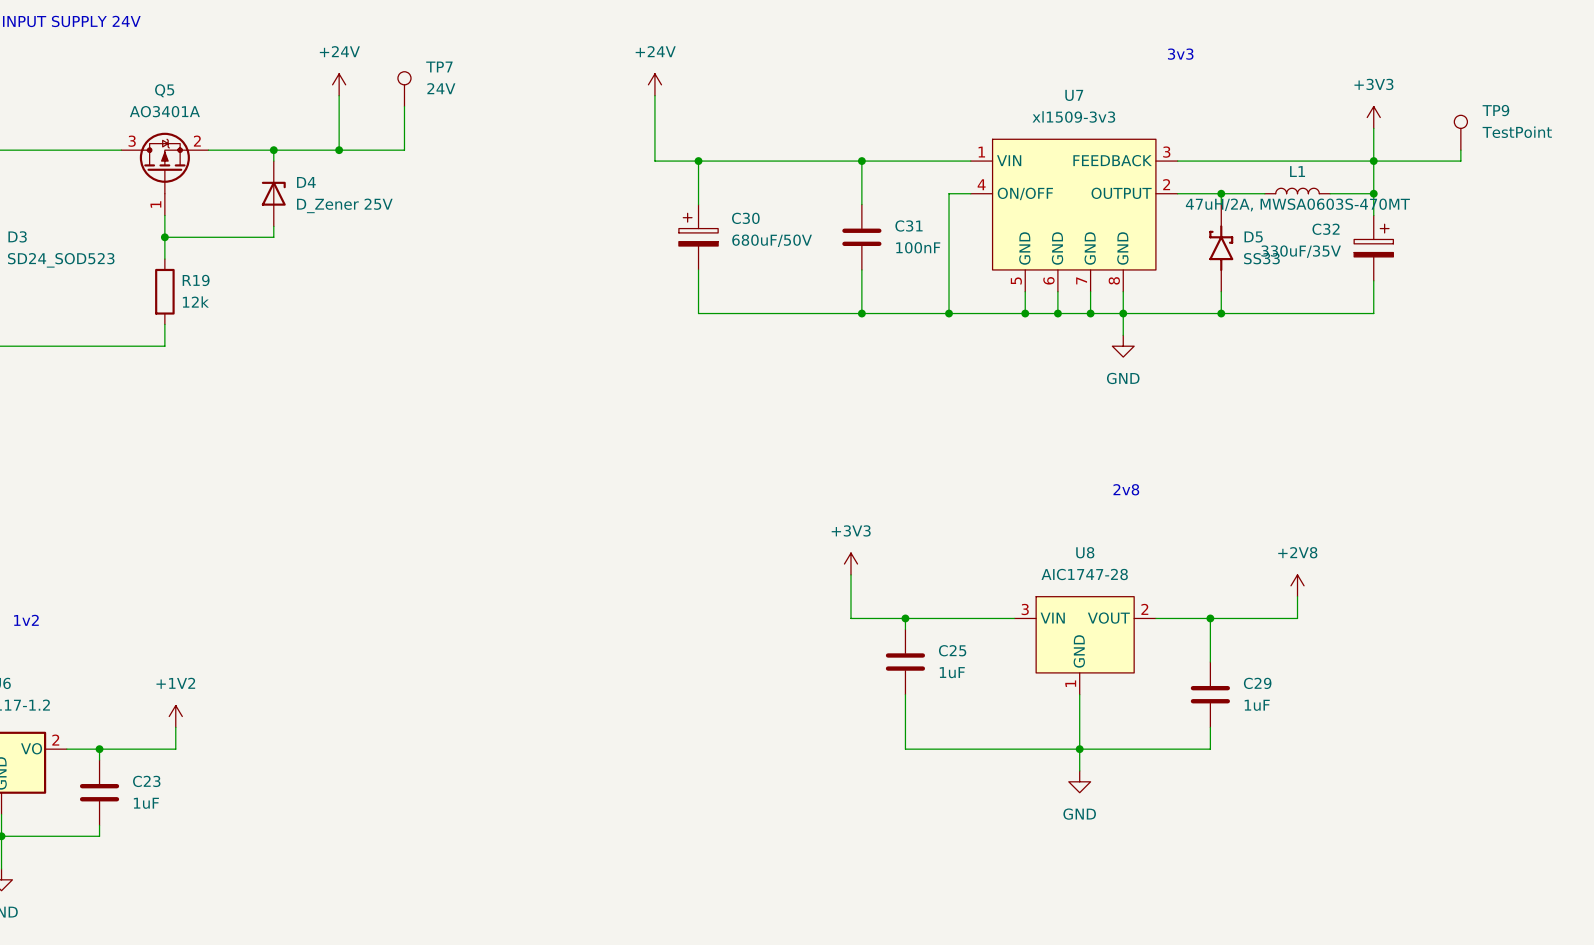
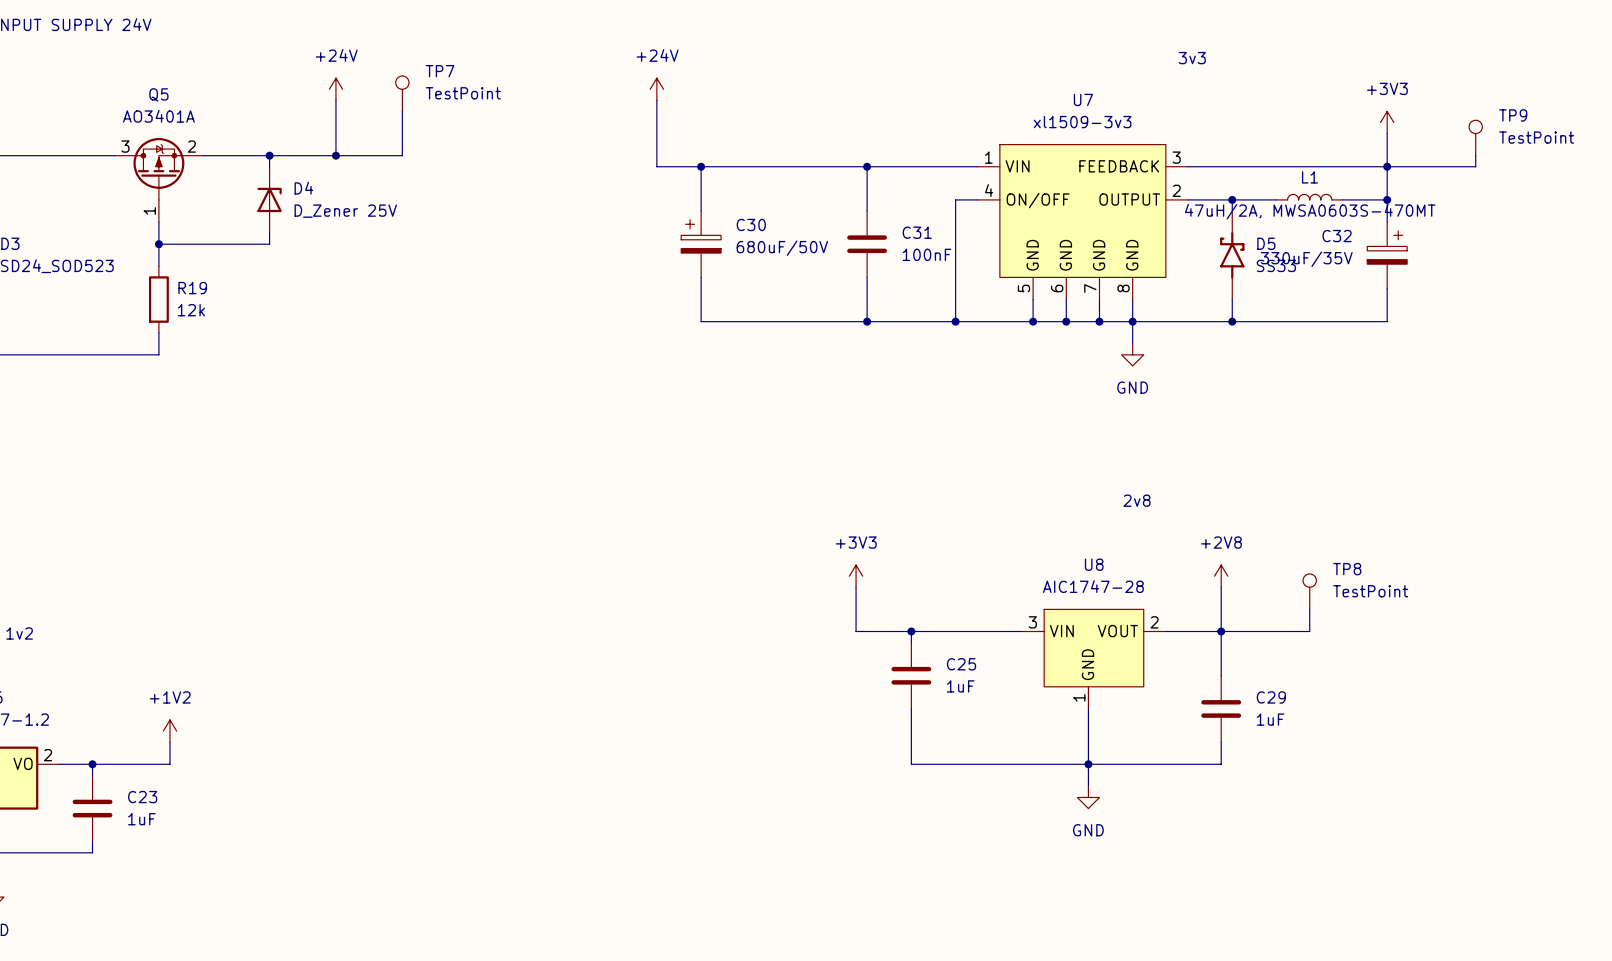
TP7 value: 24V (441, 88) -> TestPoint (463, 93)
wire: none -> (1221, 587) (1221, 631)
TP8: none -> TestPoint (1309, 591)
power symbol position: +2V8 (1297, 585) -> +2V8 (1221, 576)

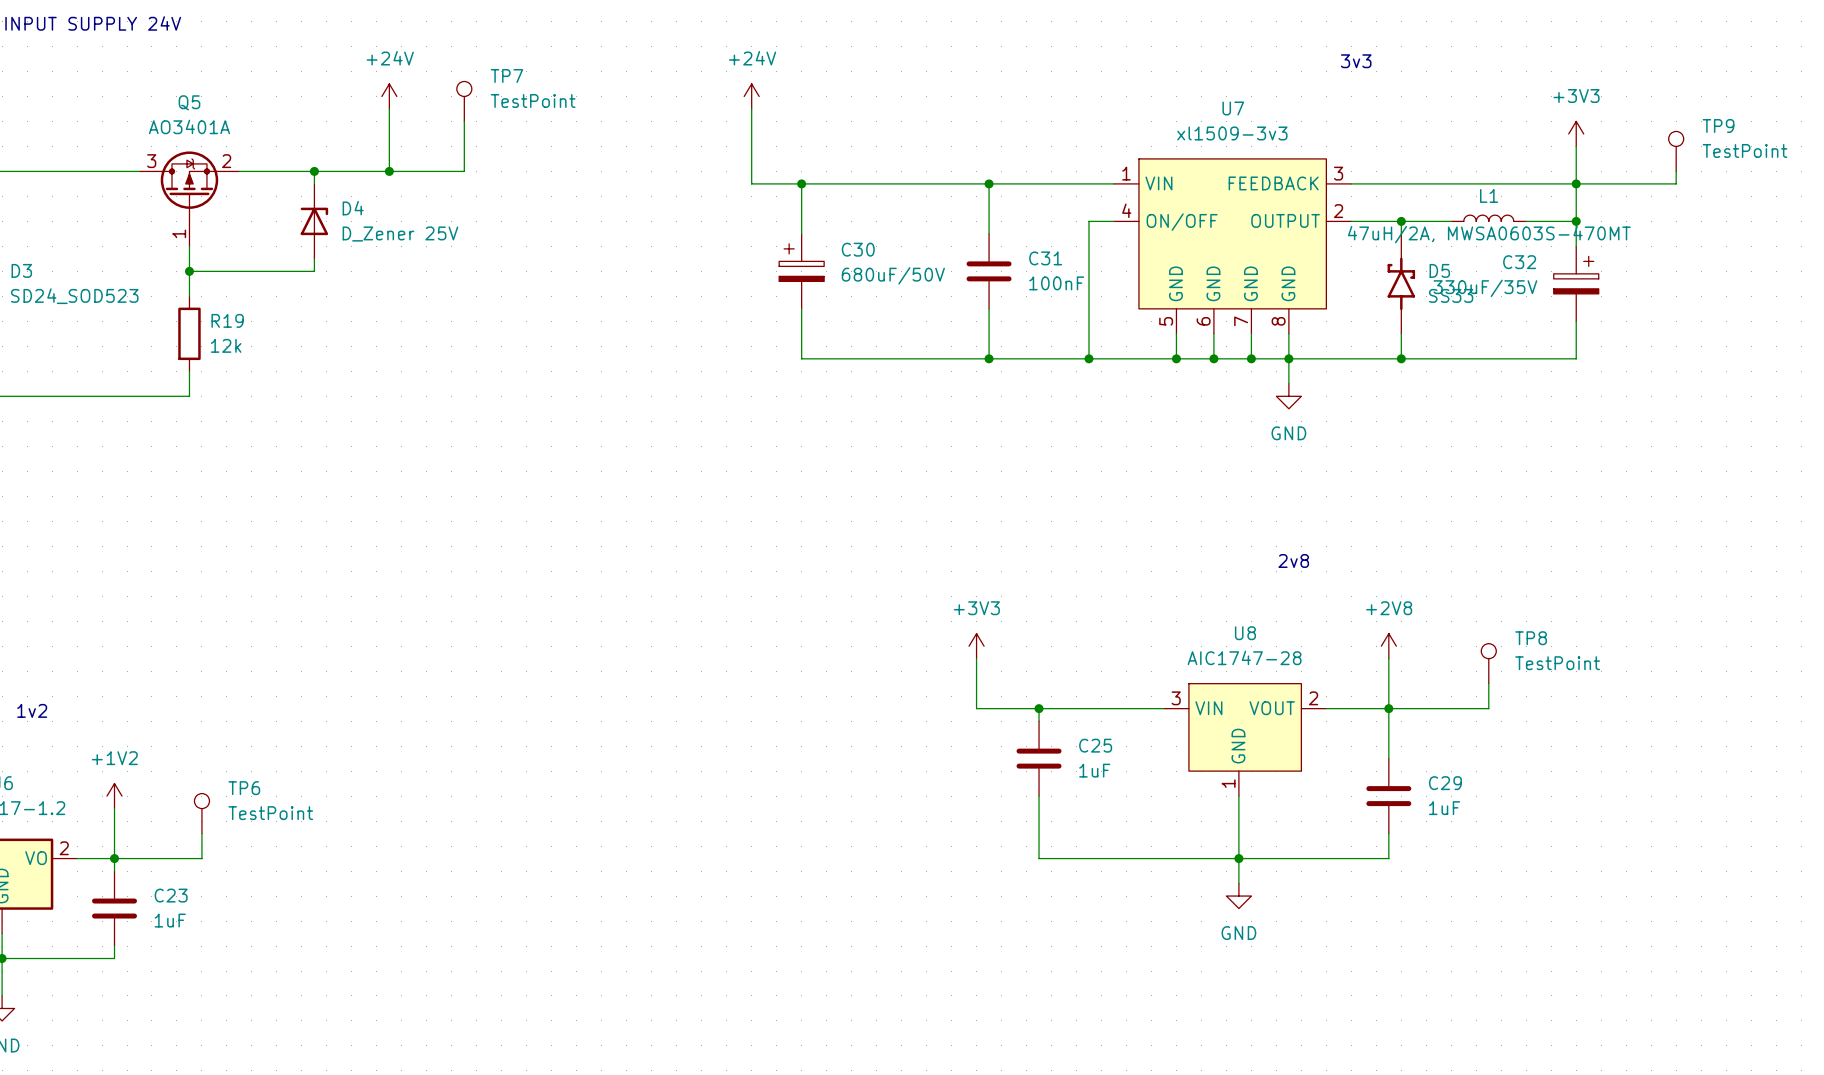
wire: none -> (114, 808) (114, 858)
TP6: none -> TestPoint (201, 813)
power symbol position: +1V2 (169, 731) -> +1V2 (114, 796)

